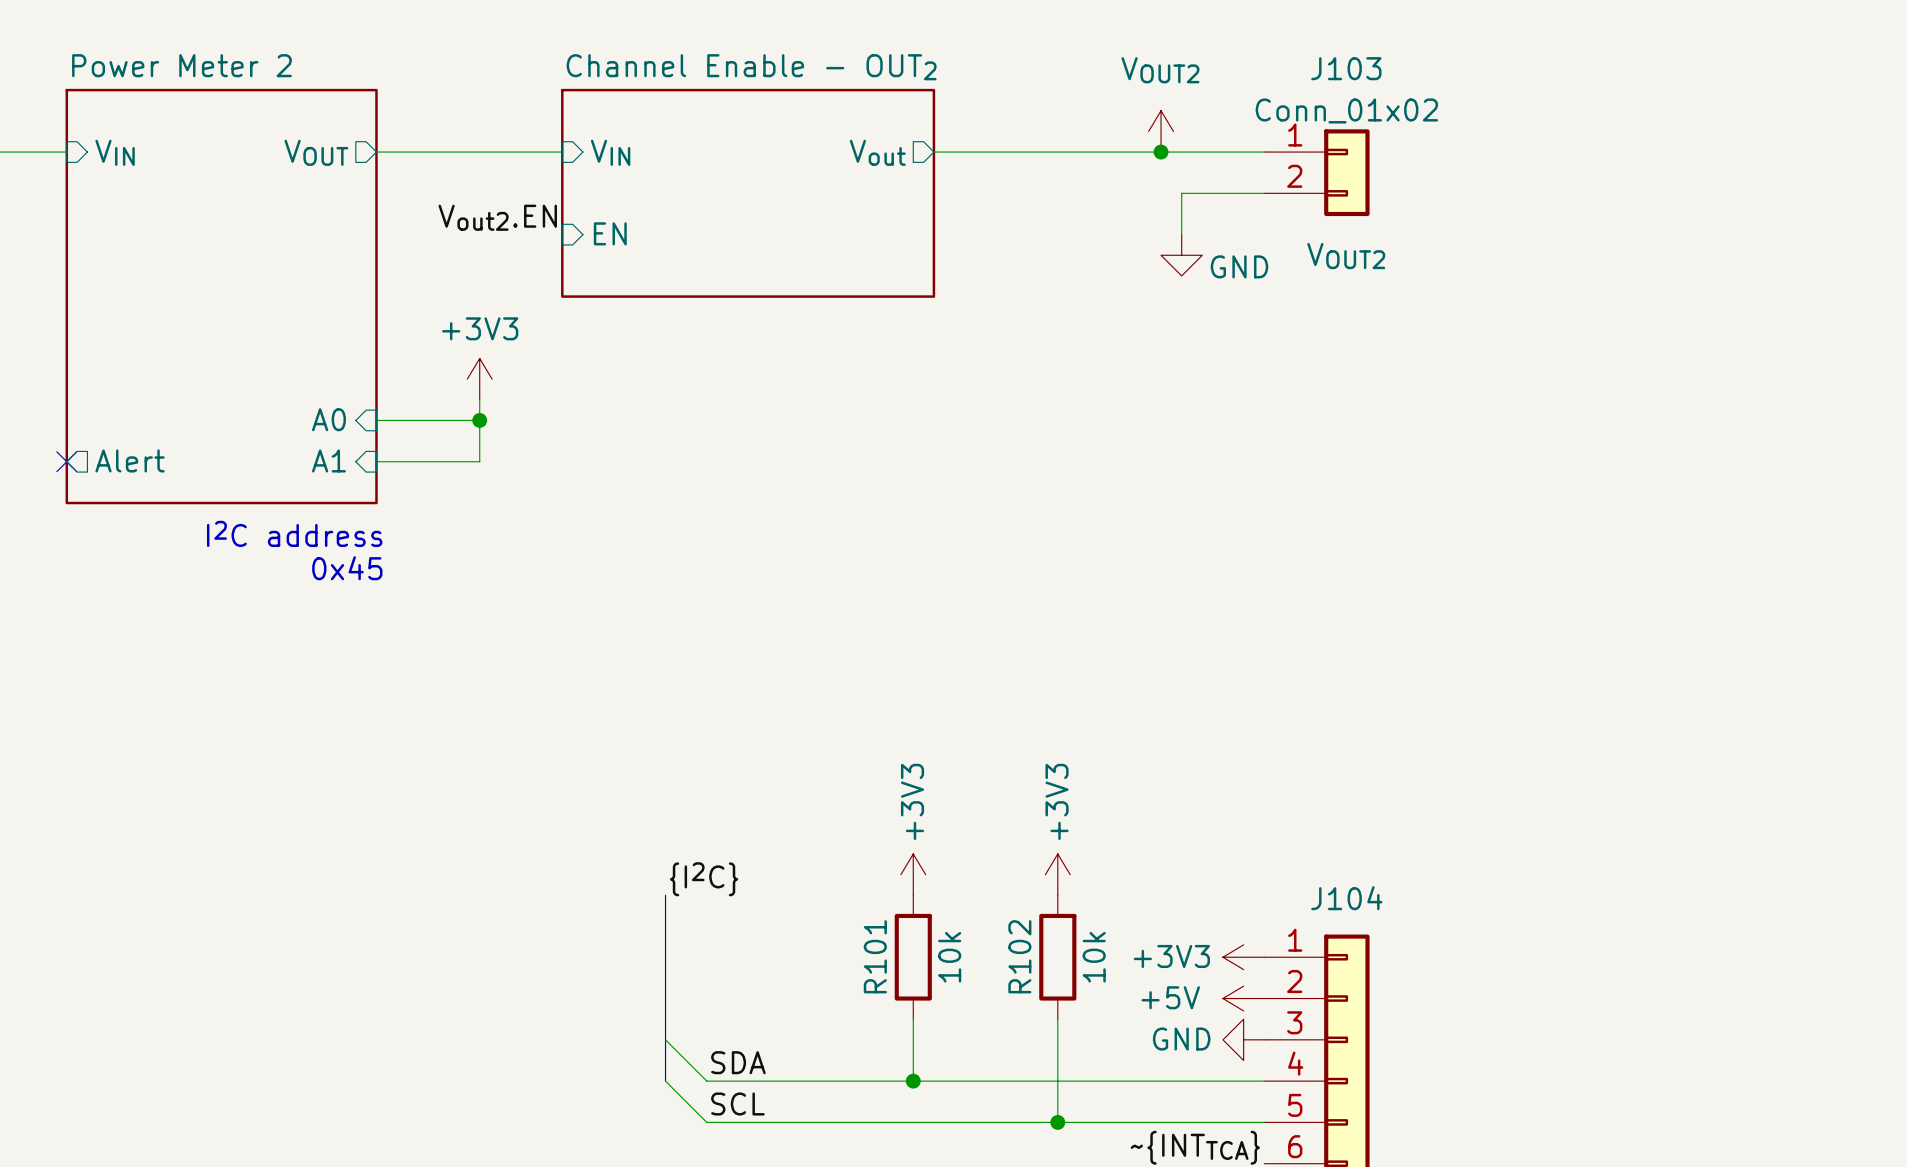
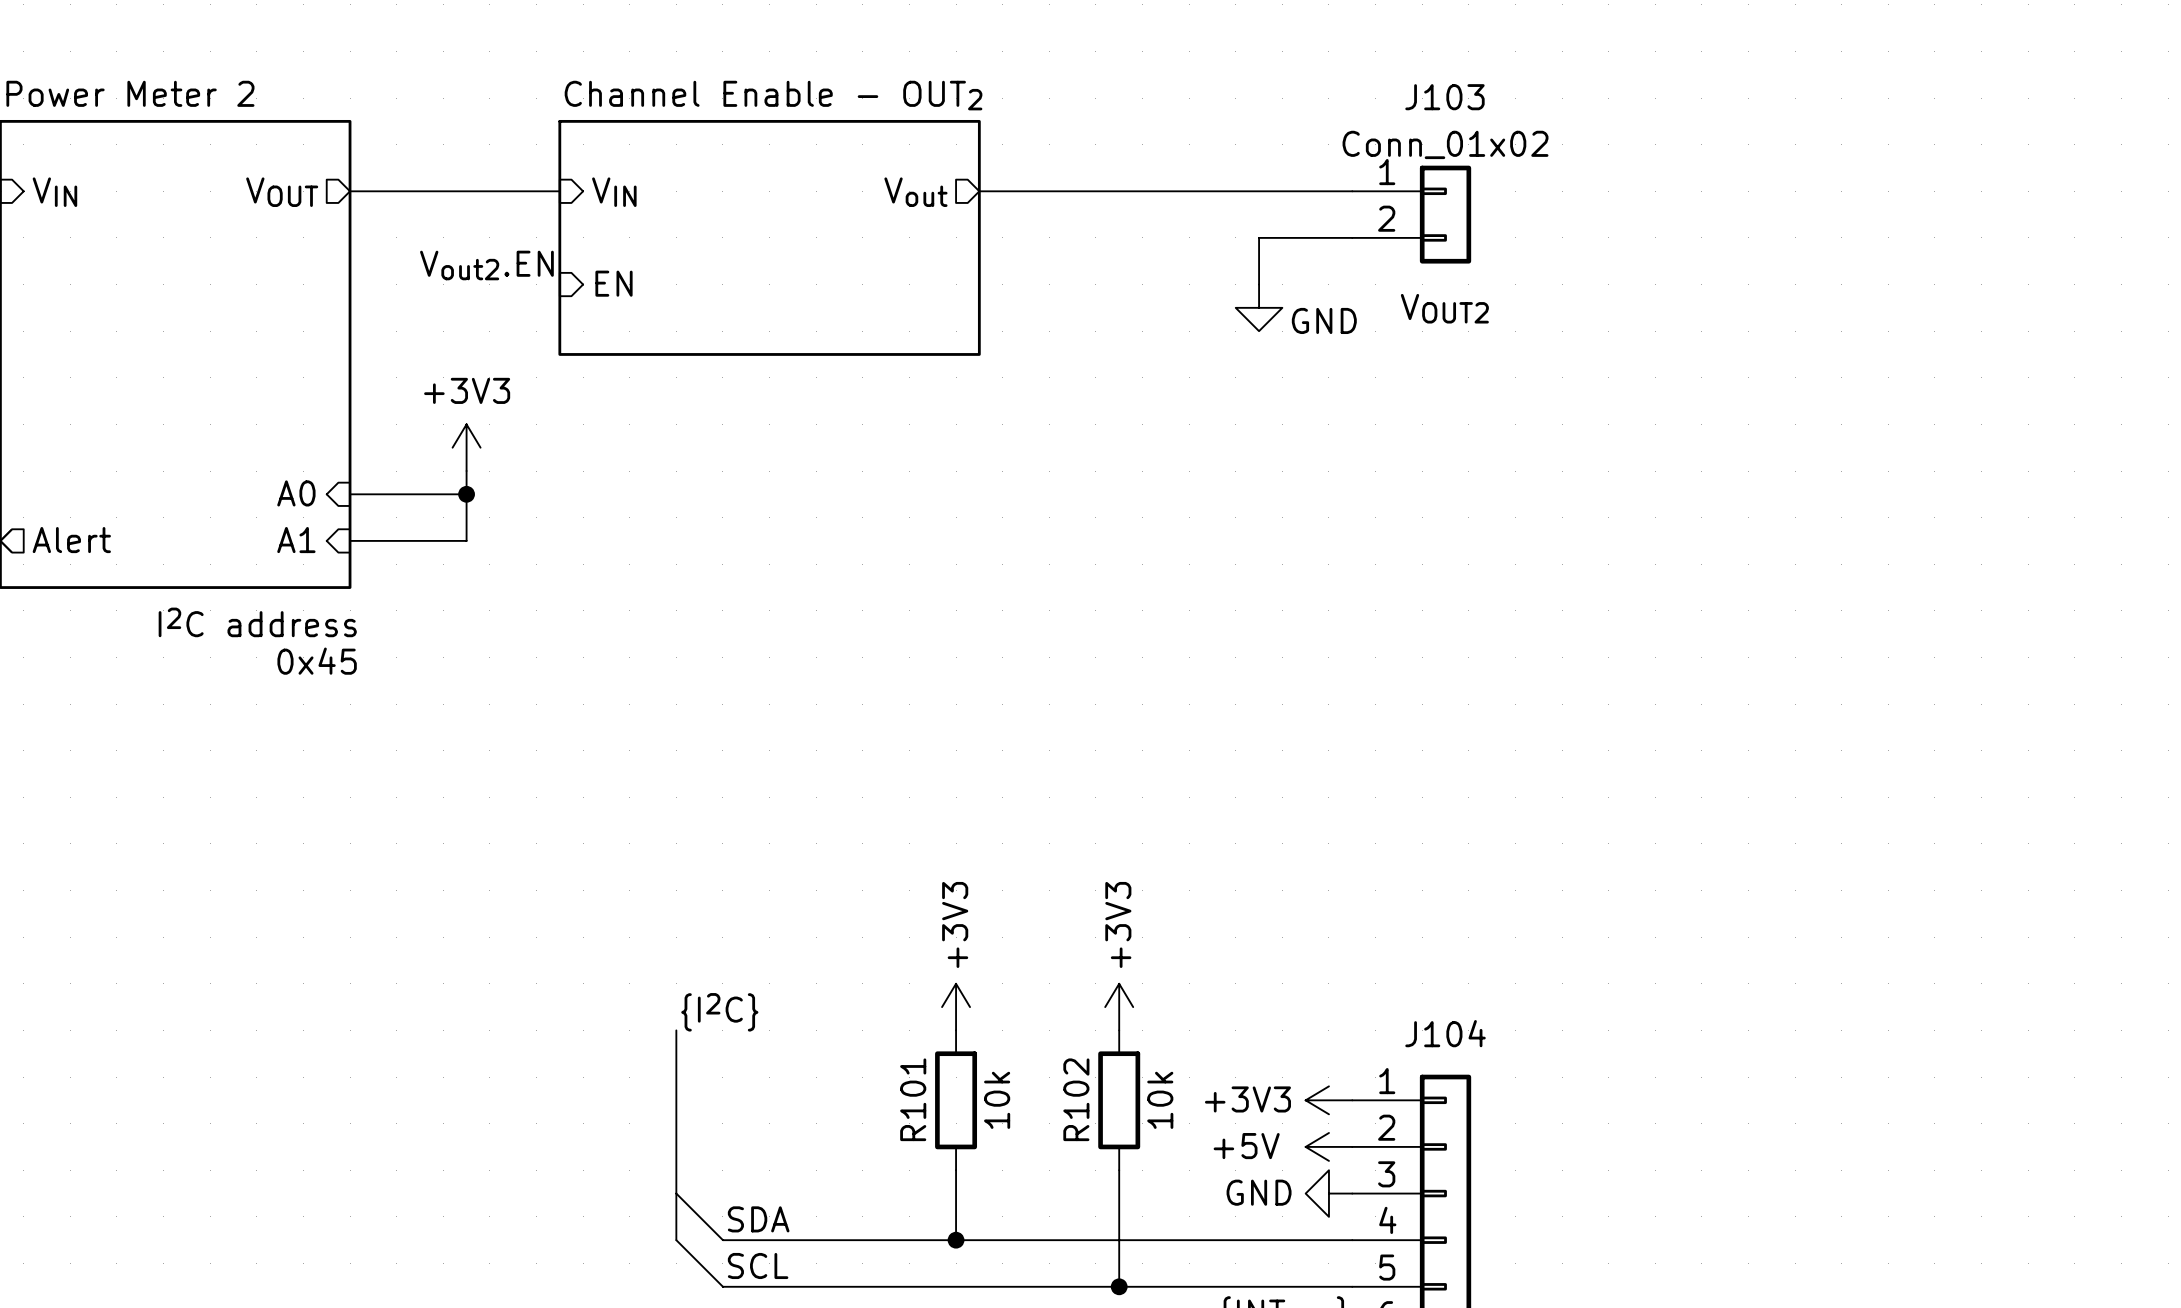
power symbol: VOUT2 (1161, 131) -> none
junction: (1161, 152) -> none

